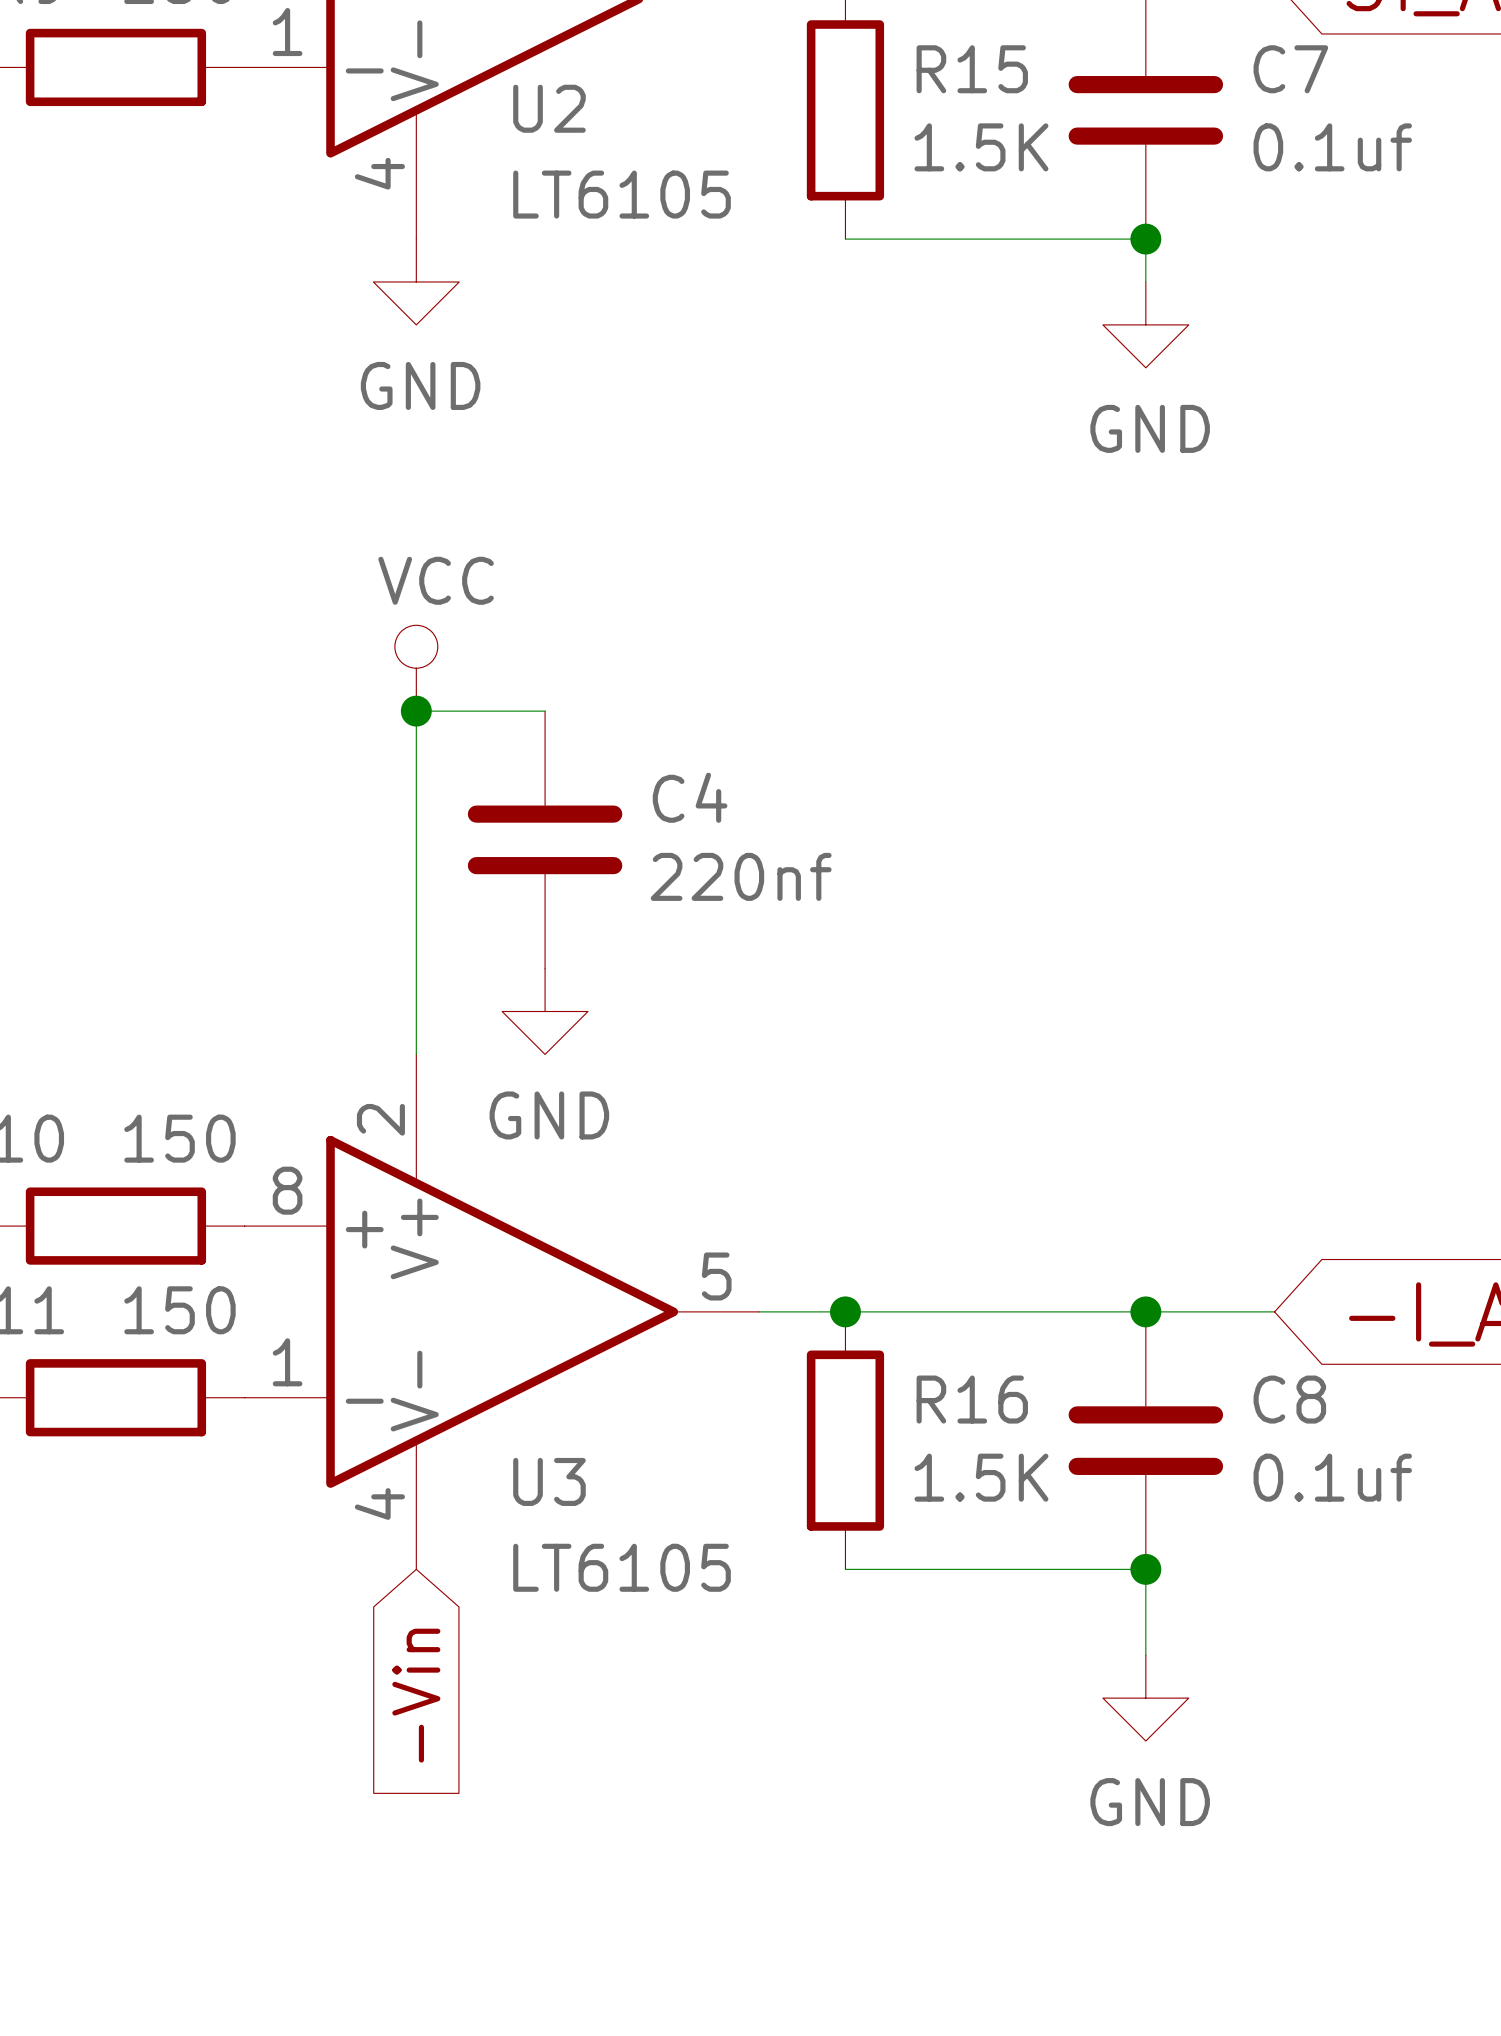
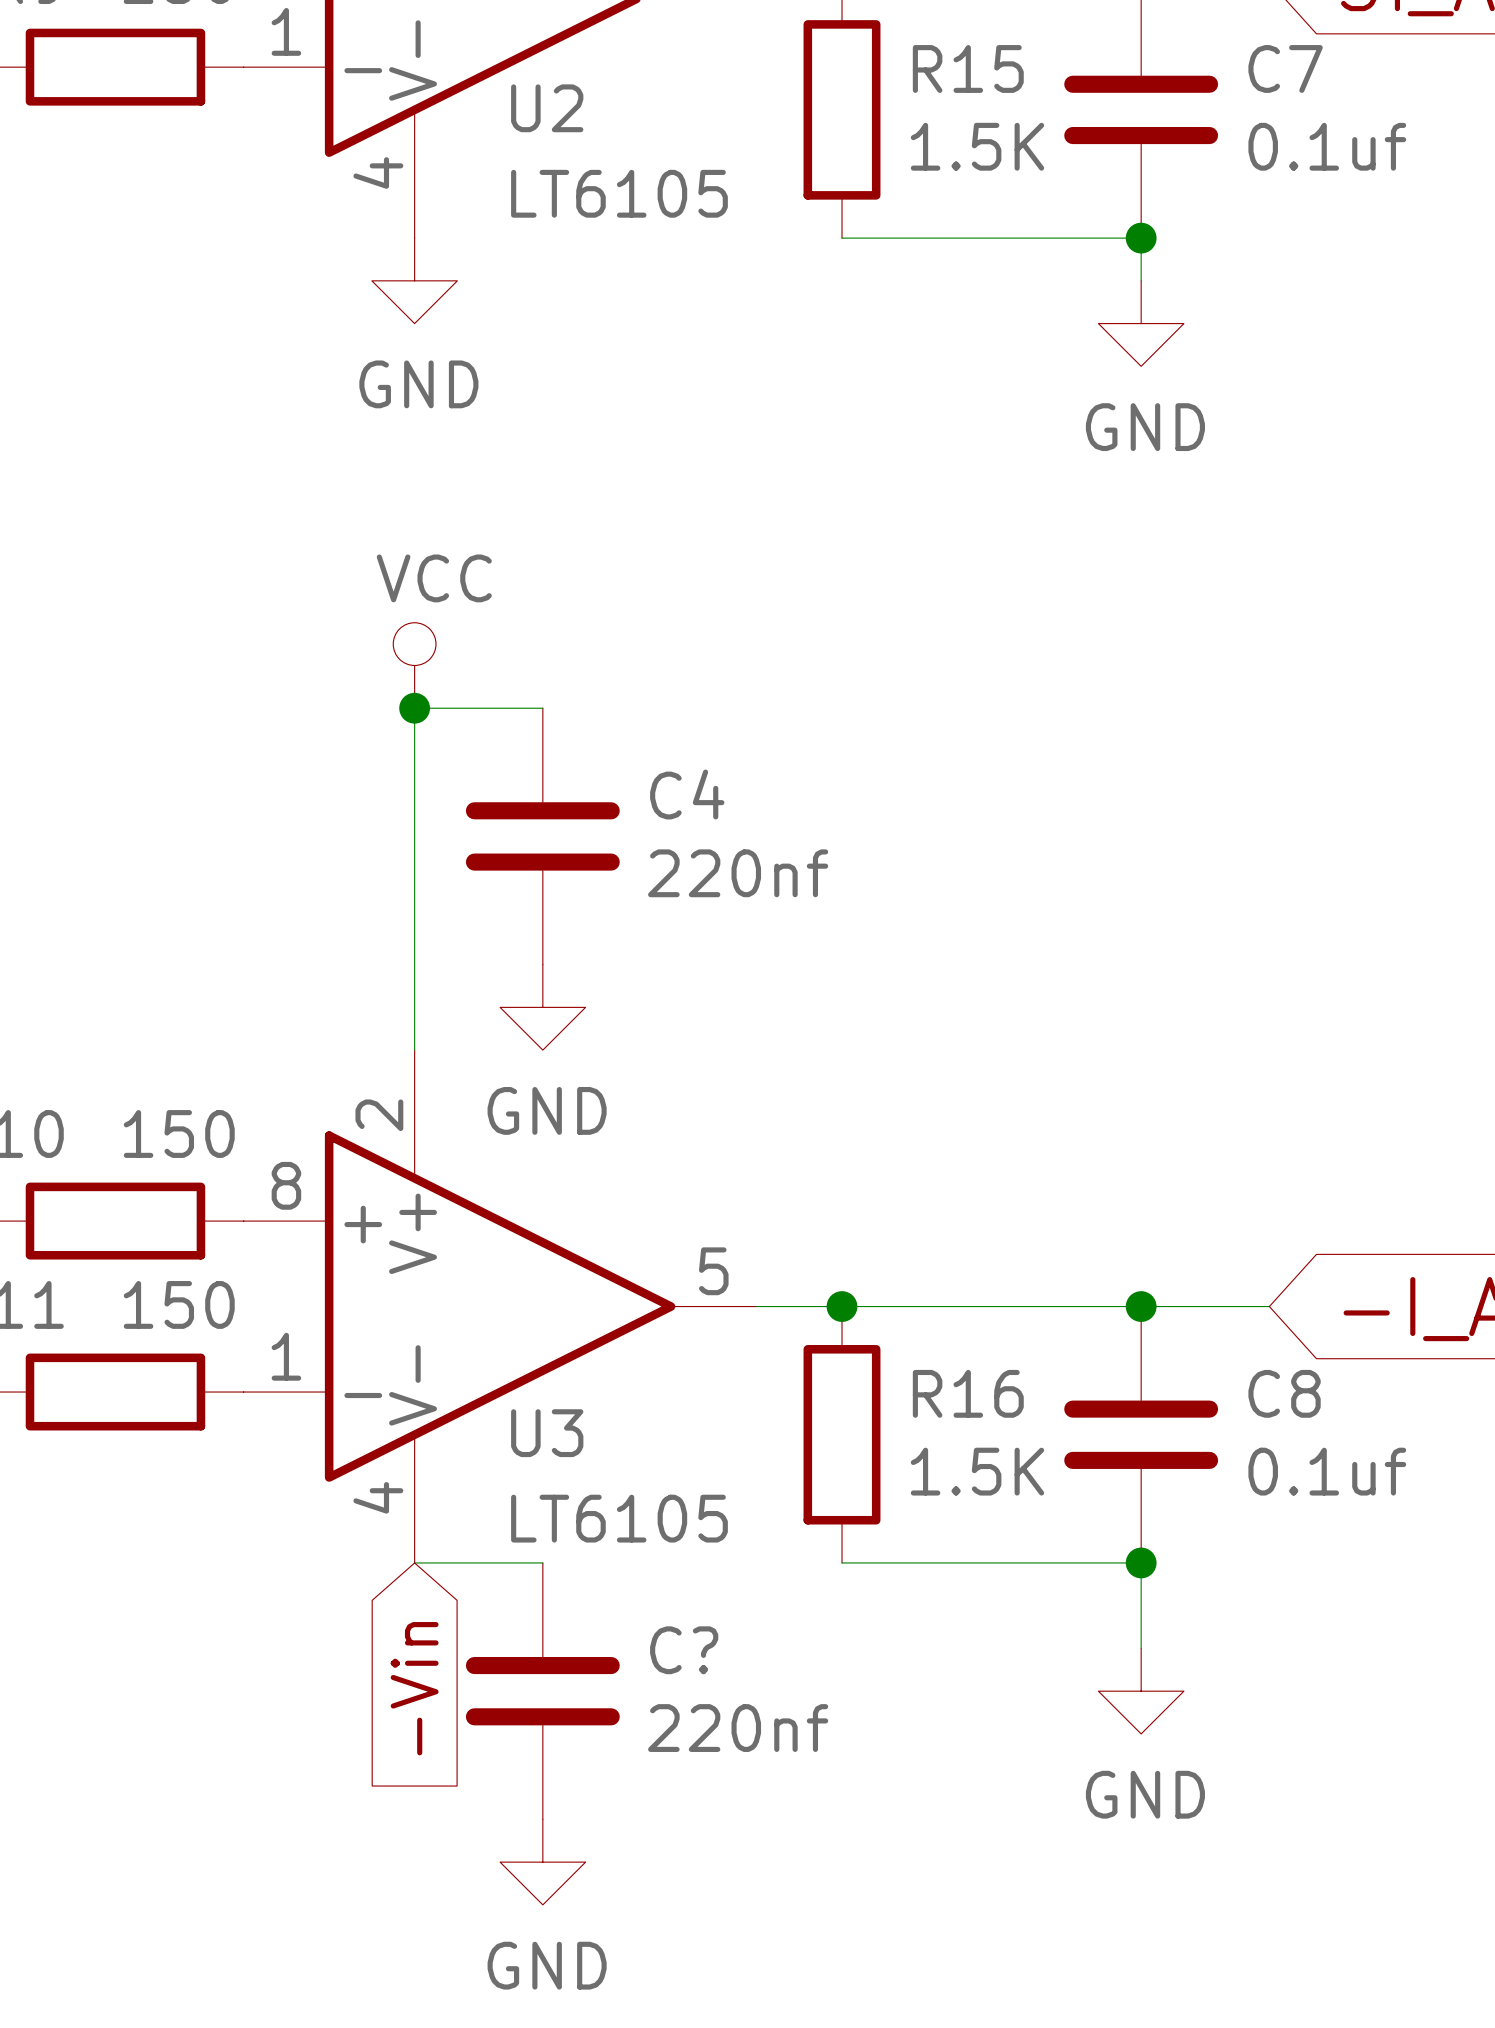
U3 name position: U3 (549, 1481) -> U3 (547, 1433)
U3 value position: LT6105 (622, 1567) -> LT6105 (619, 1518)
wire: none -> (414, 1562) (542, 1562)
C?: none -> 220nf (542, 1691)
power symbol: none -> GND (542, 1862)

